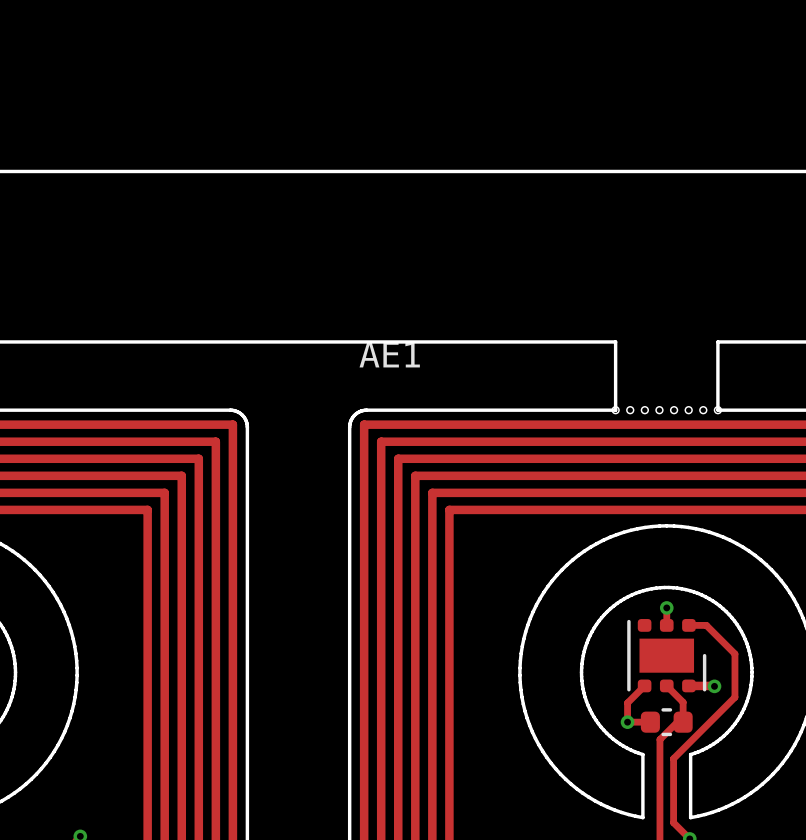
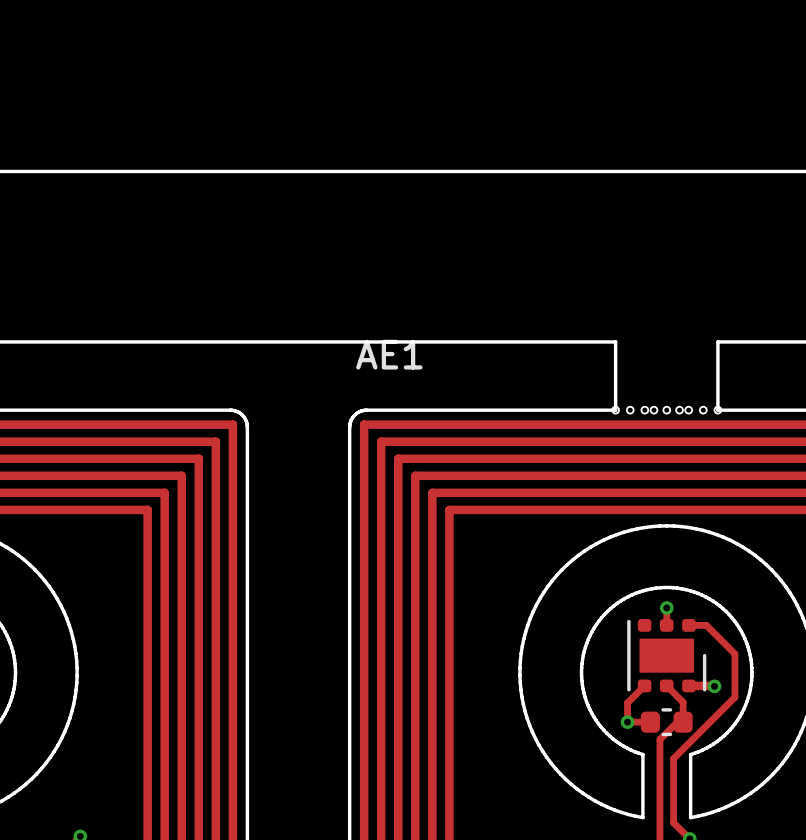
part: none -> (653, 410)
part: (659, 410) -> none
part: none -> (666, 410)
part: (674, 410) -> none
part: none -> (679, 410)

